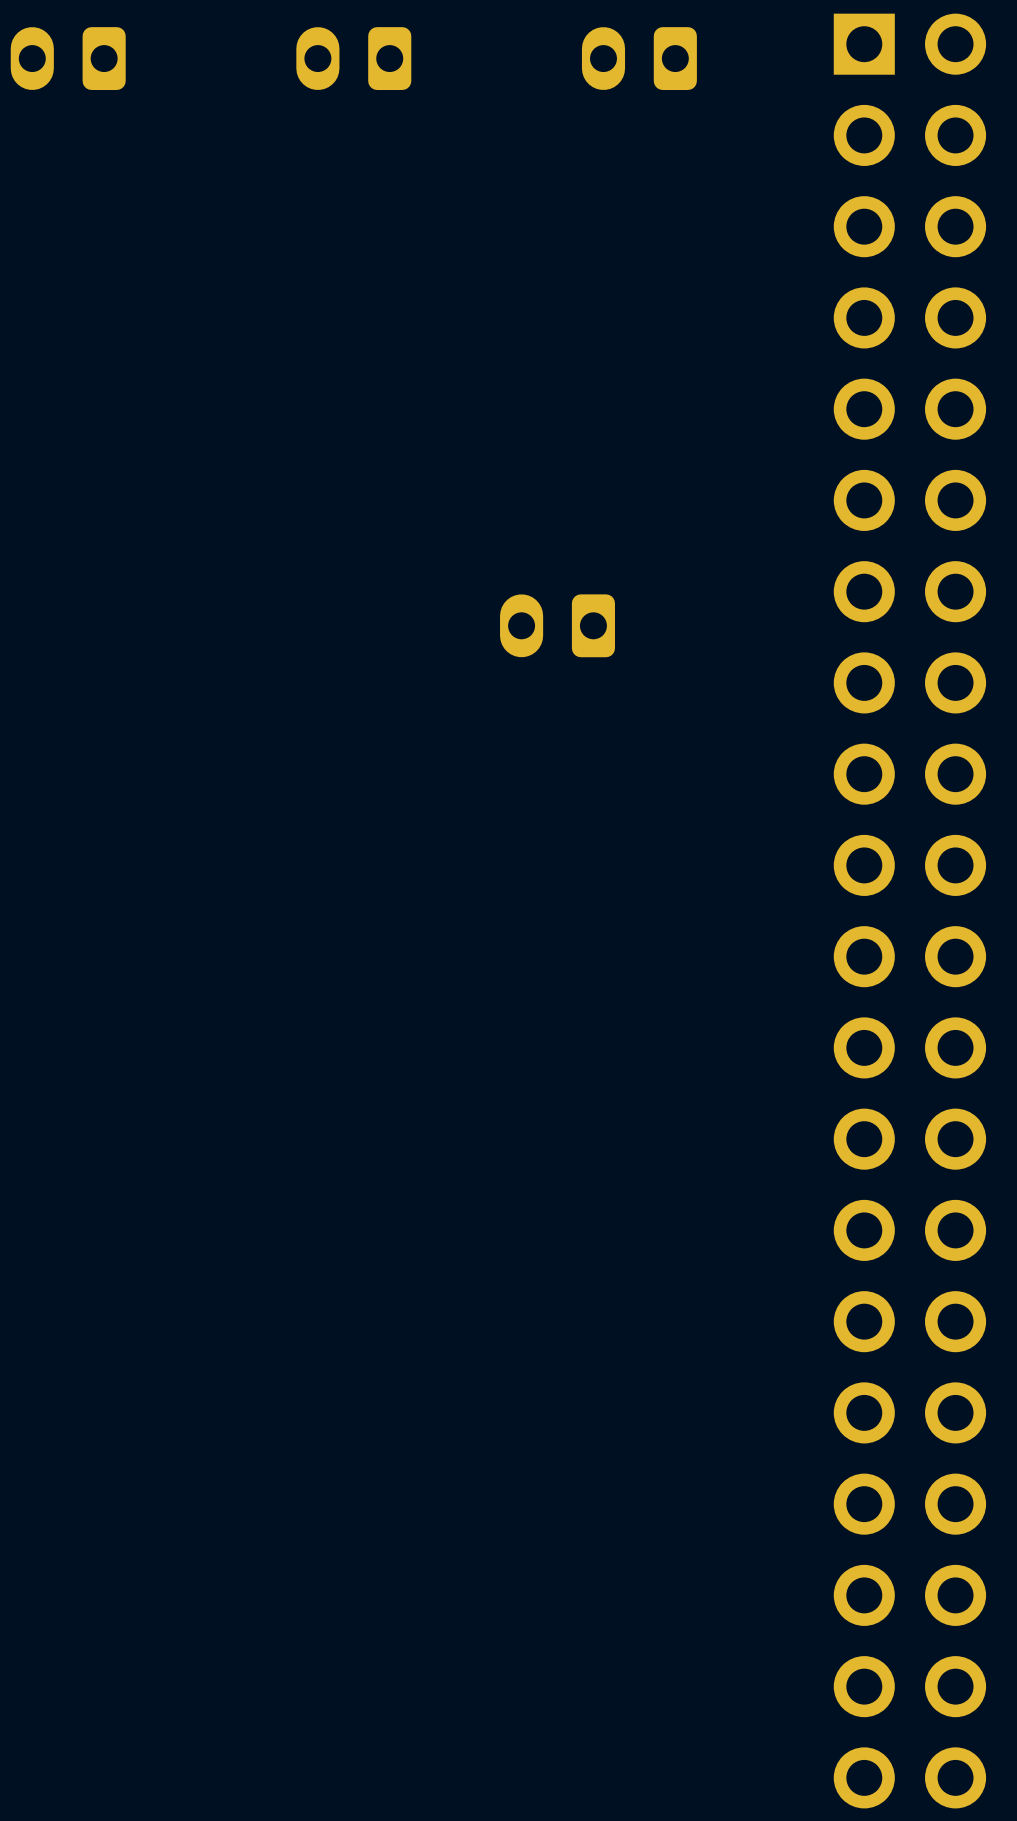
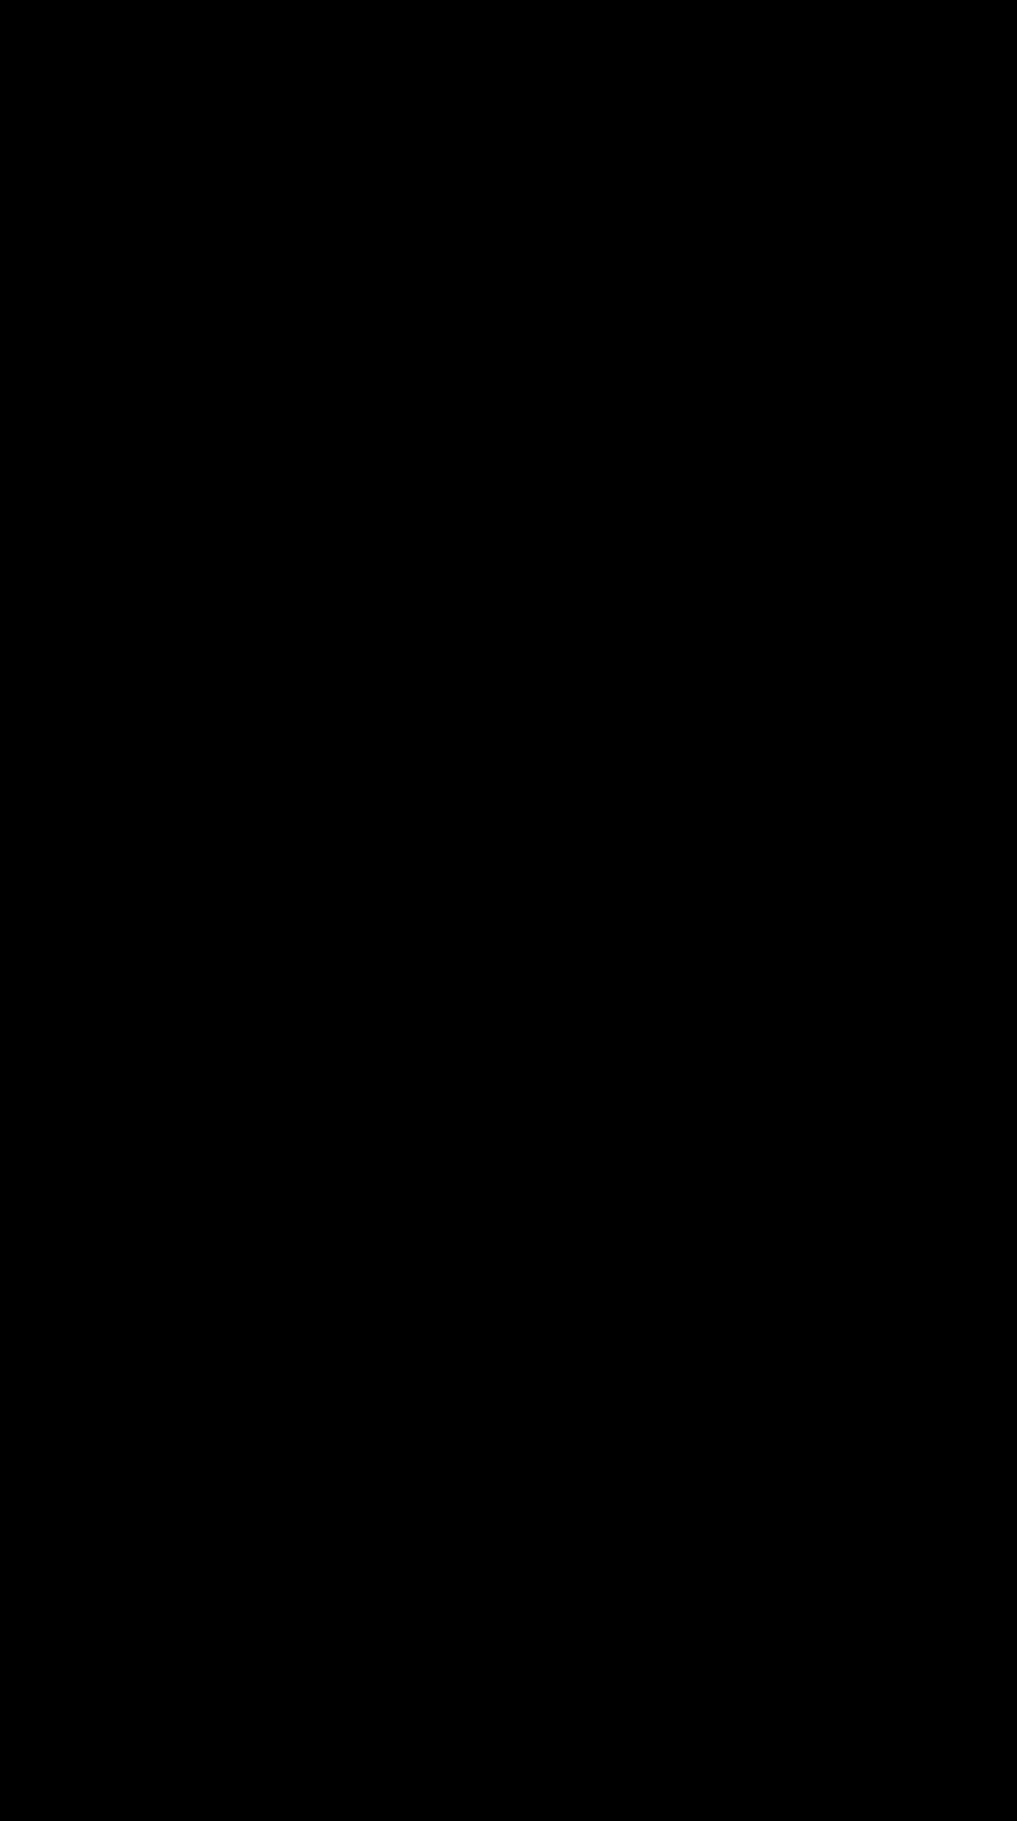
part: (68, 58) -> none
part: (353, 58) -> none
part: (639, 58) -> none
part: (557, 625) -> none
part: (909, 911) -> none

